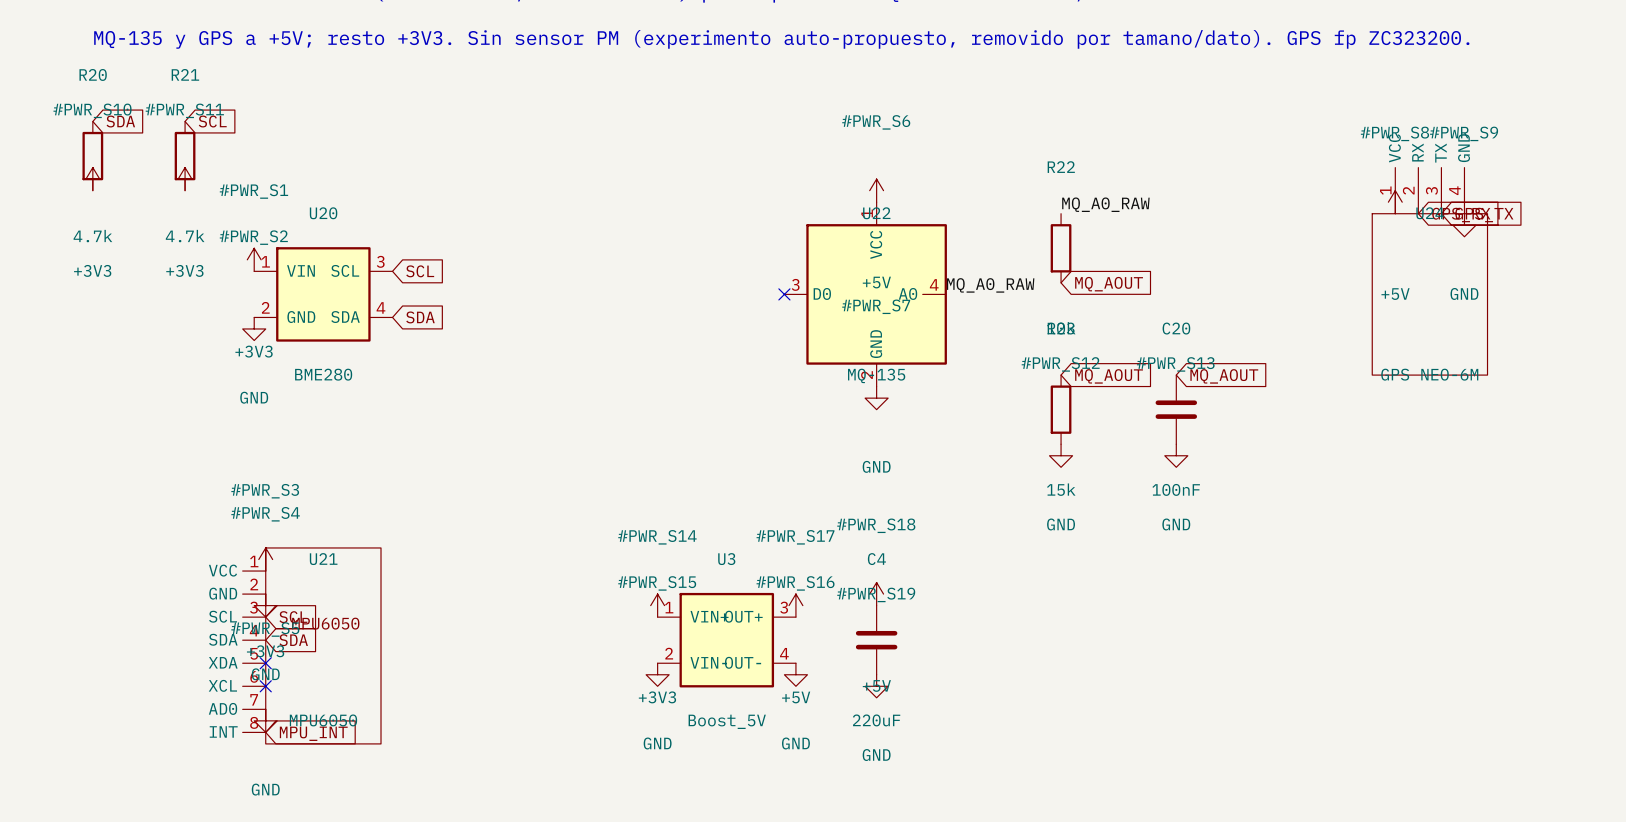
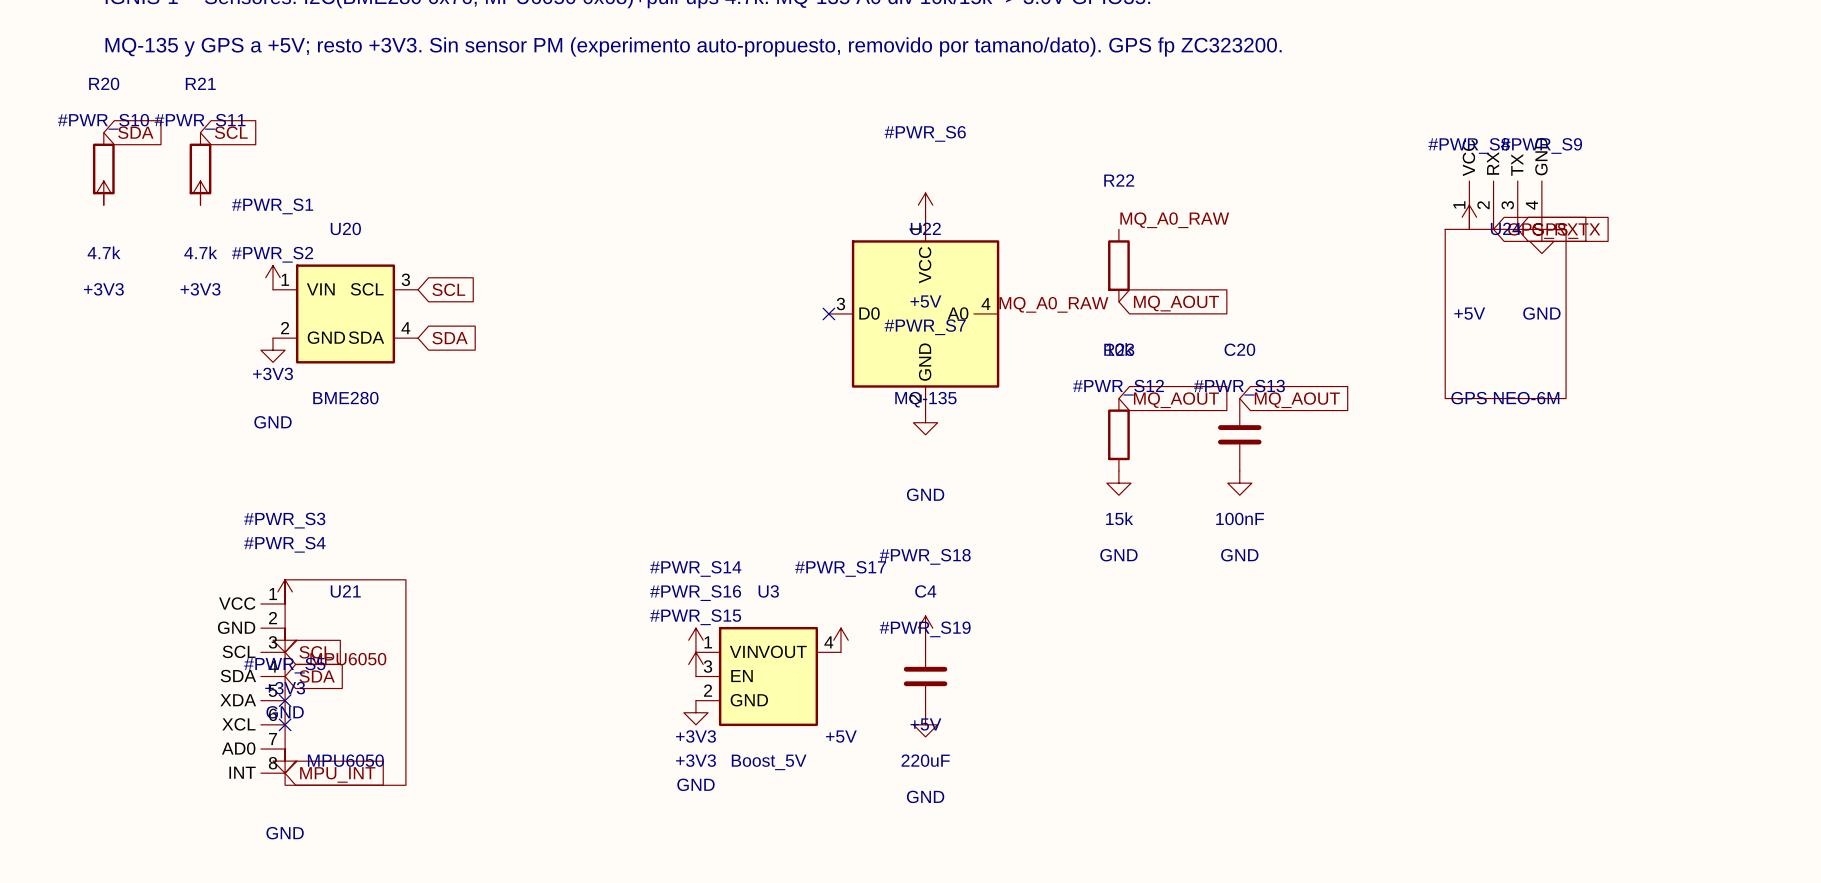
U3 symbol: [657, 592, 796, 688] -> [695, 626, 841, 727]
power symbol: GND (795, 674) -> +3V3 (695, 664)

